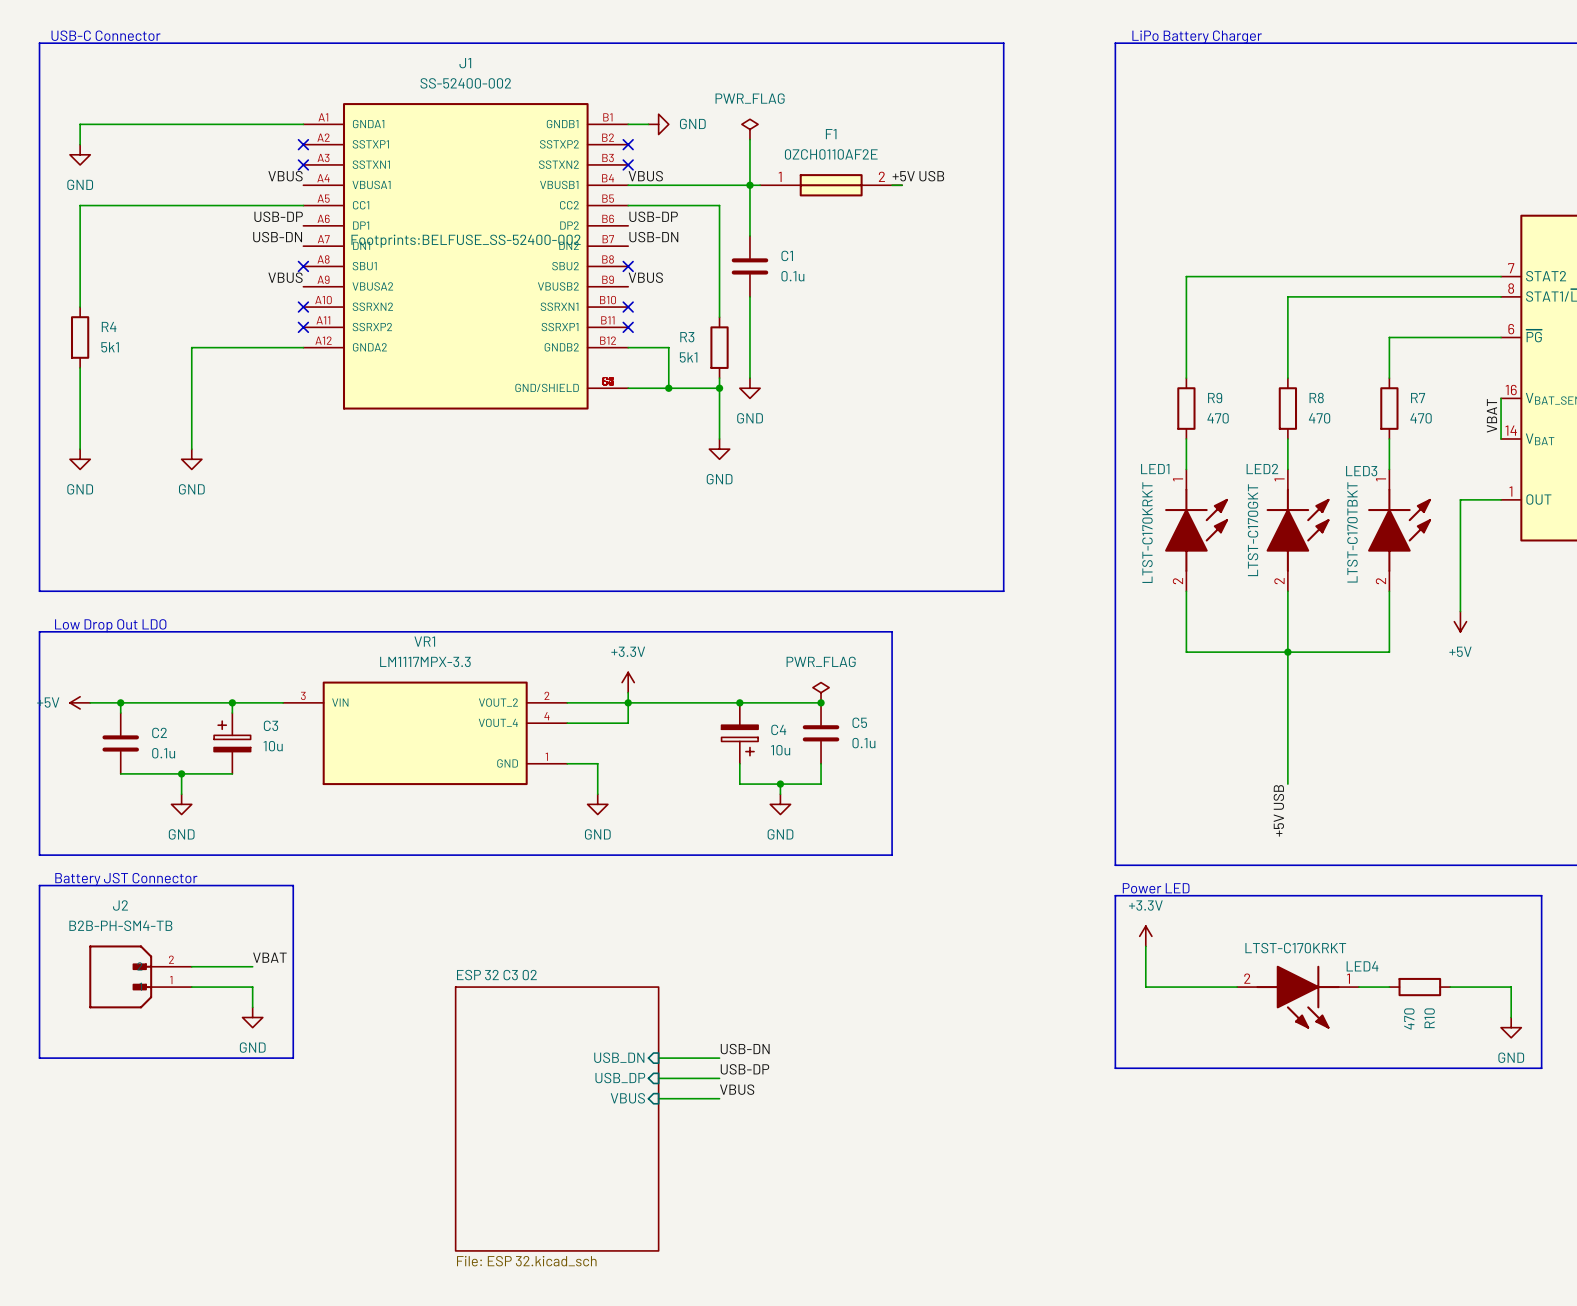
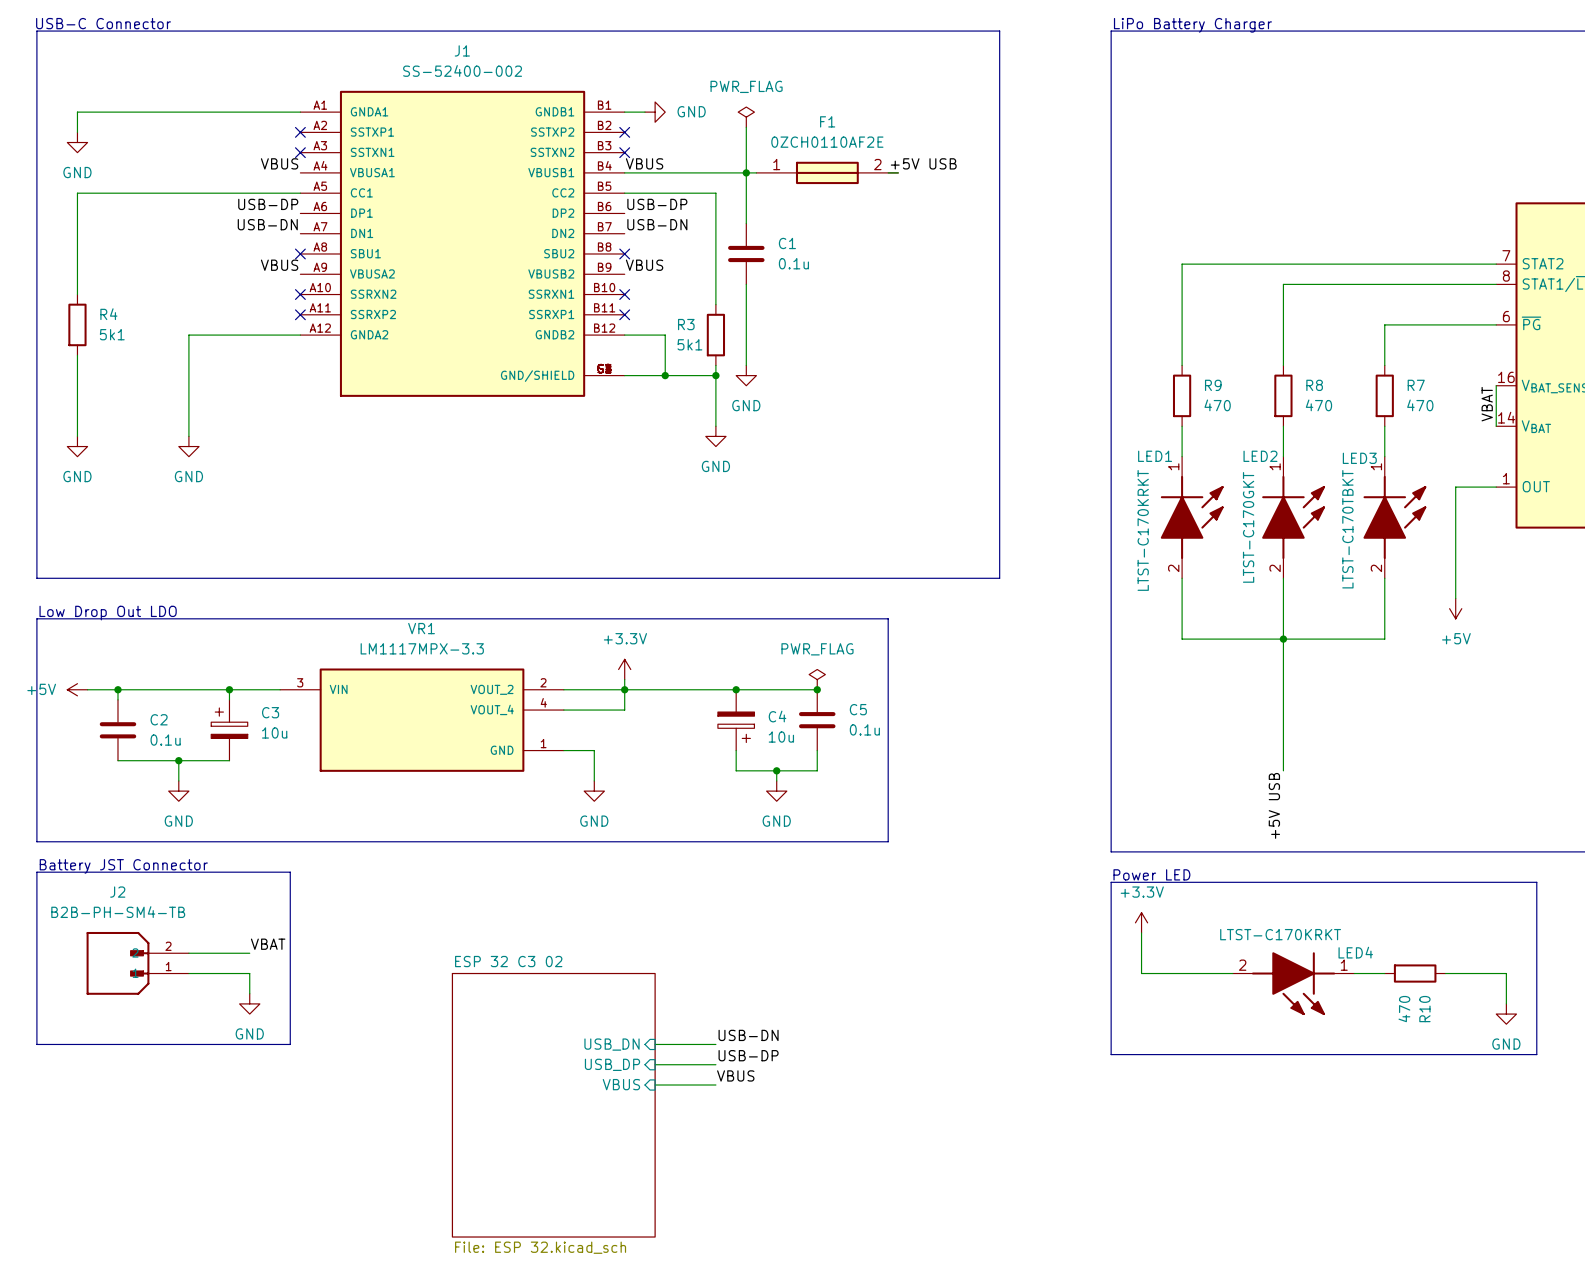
J1 text: Footprints:BELFUSE_SS-52400-002 (466, 241) -> none

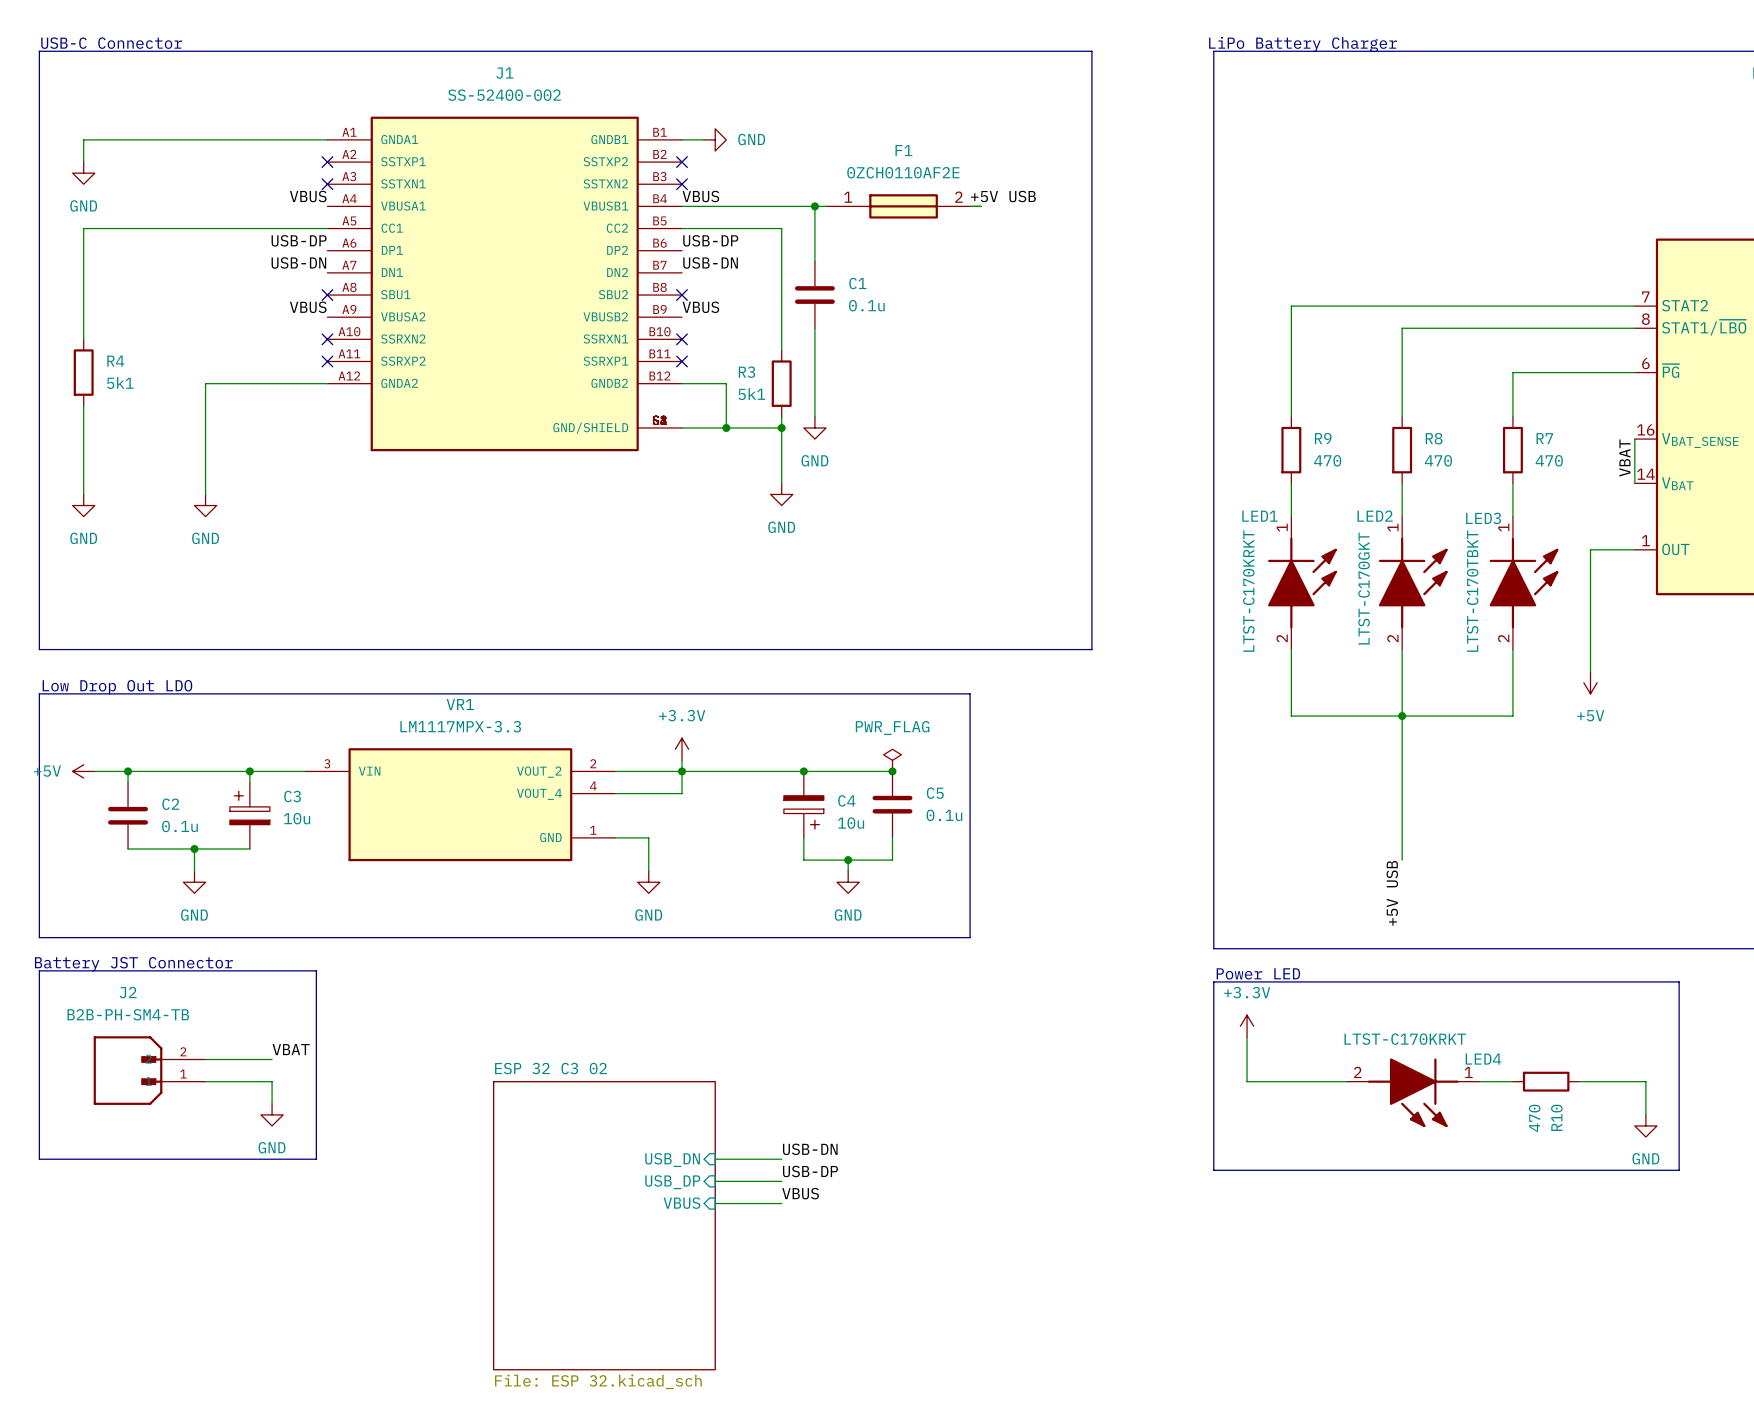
power symbol: PWR_FLAG (746, 117) -> none
wire: (746, 127) (746, 172) -> none

